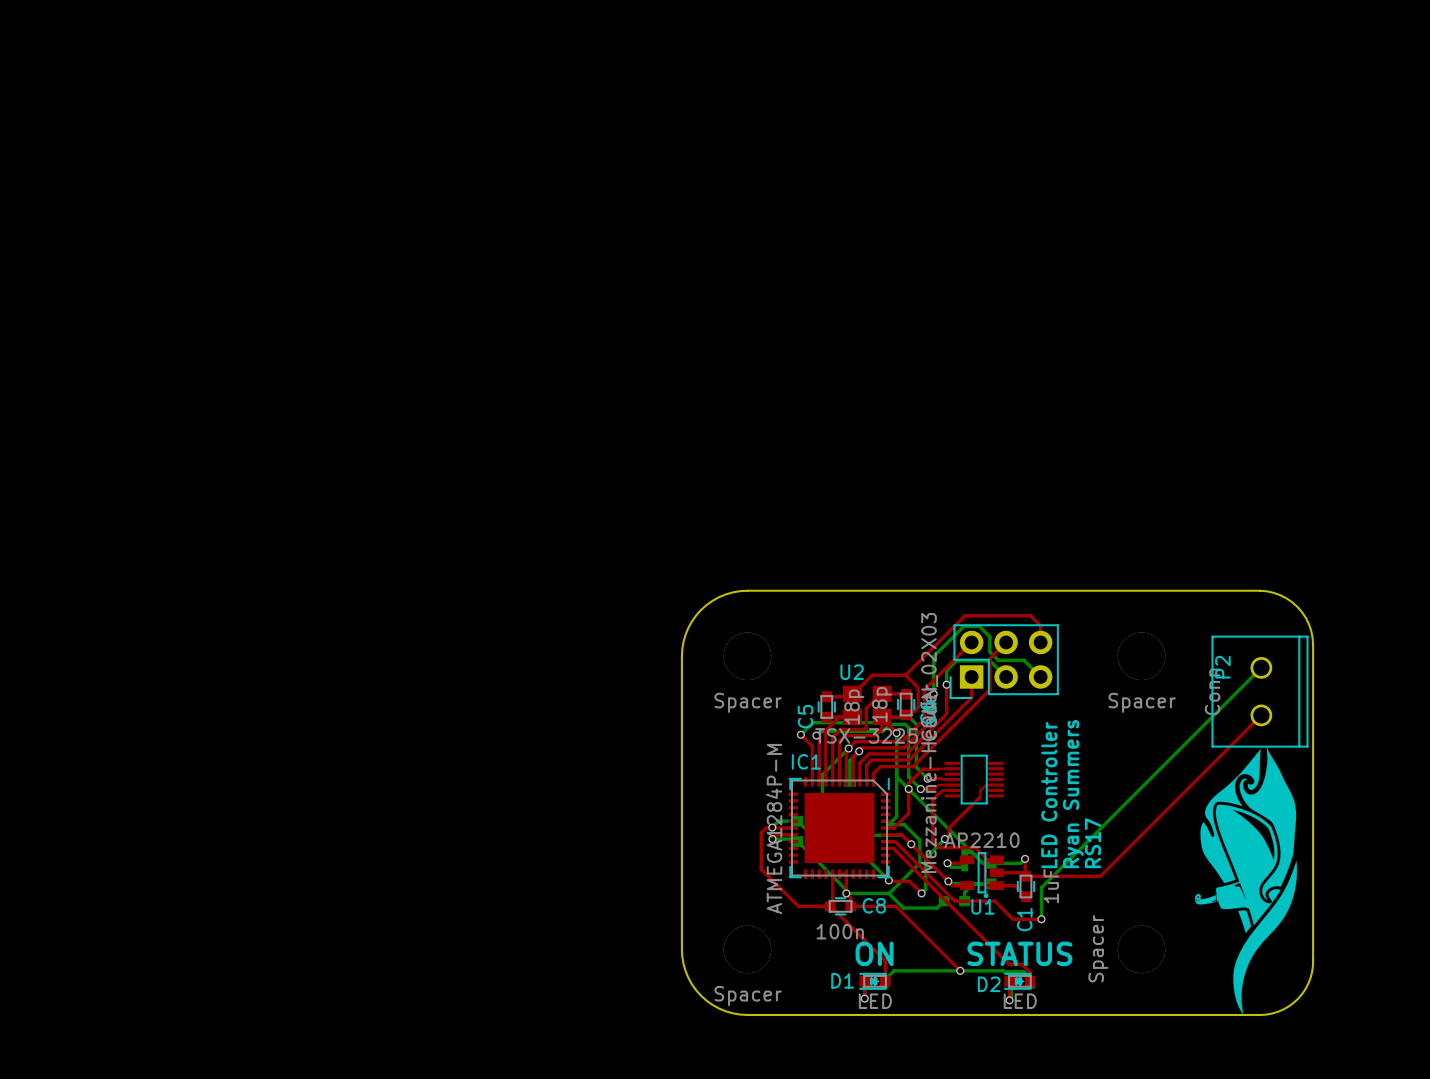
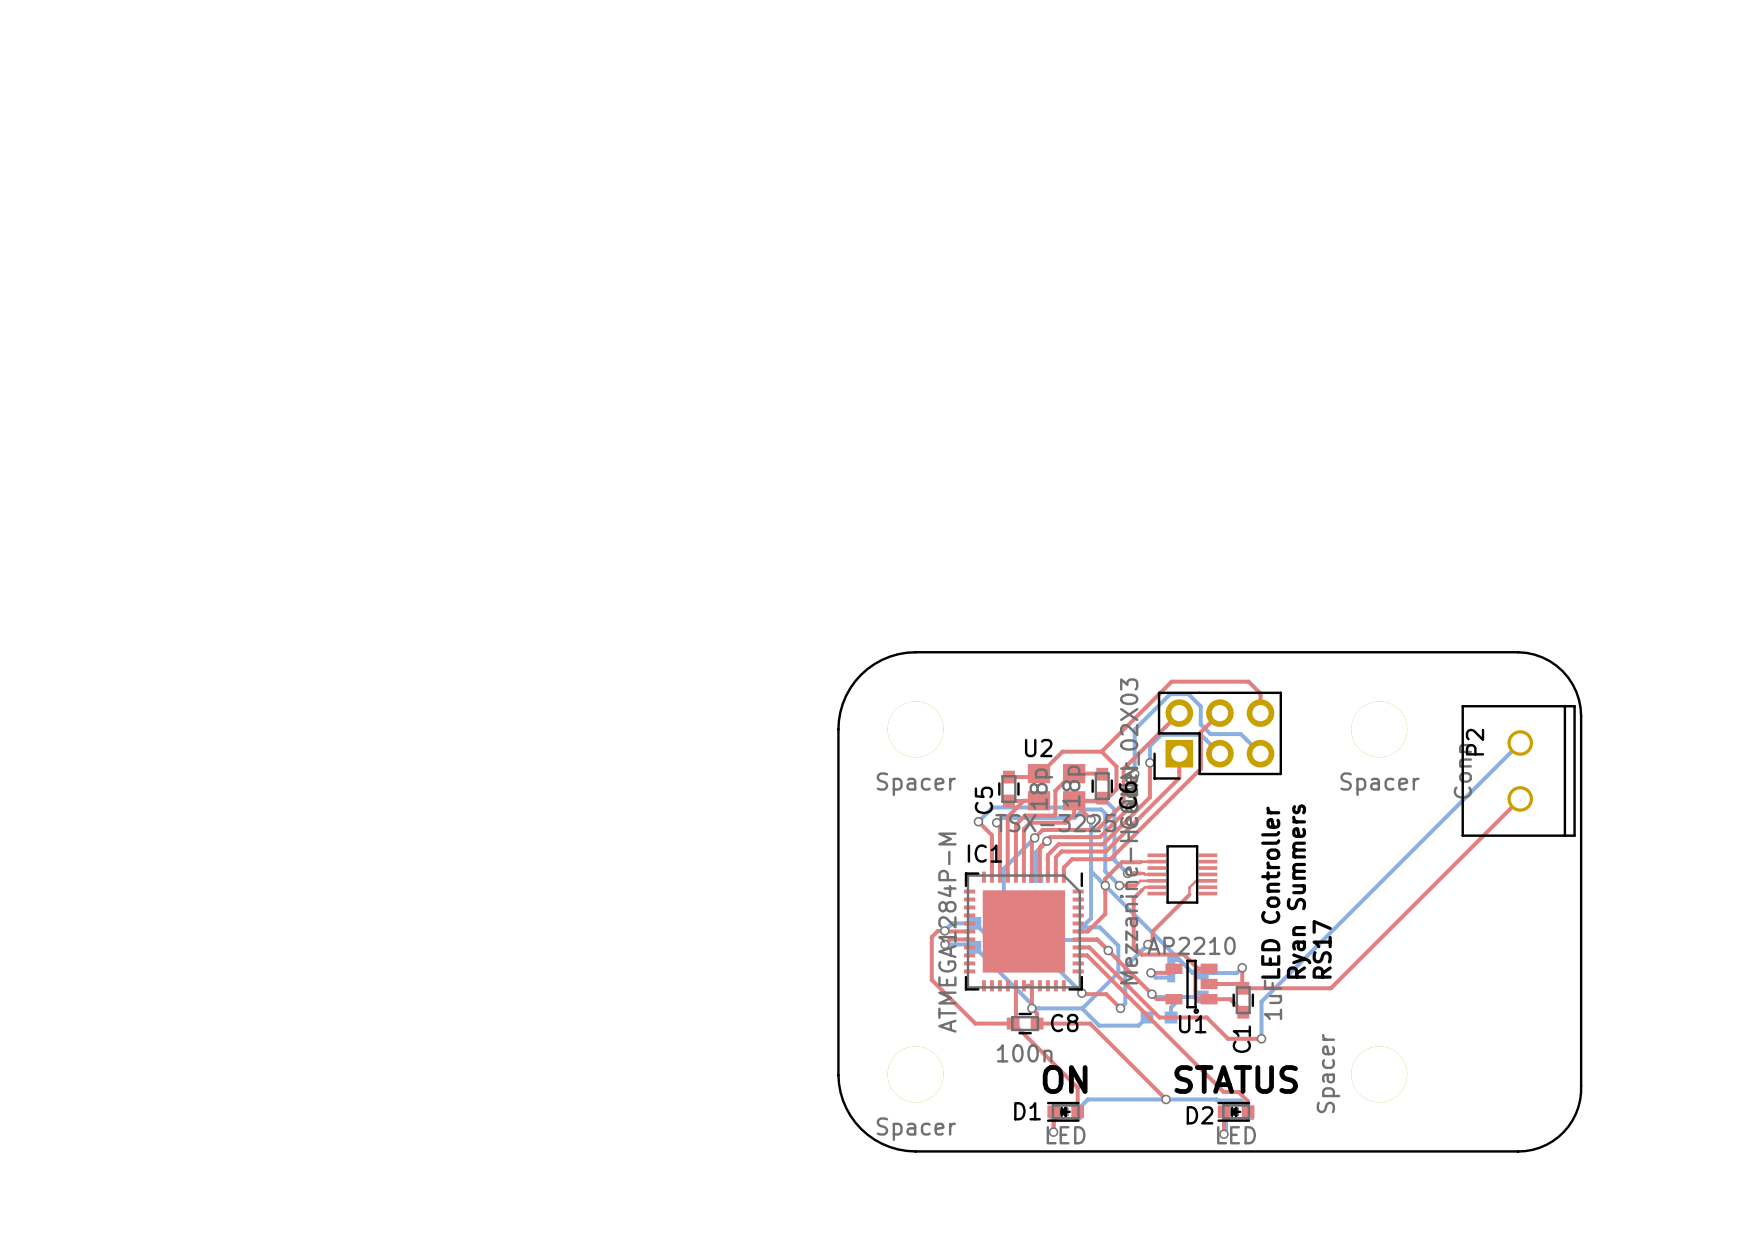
drawing: [1195, 746, 1297, 1015] -> none

